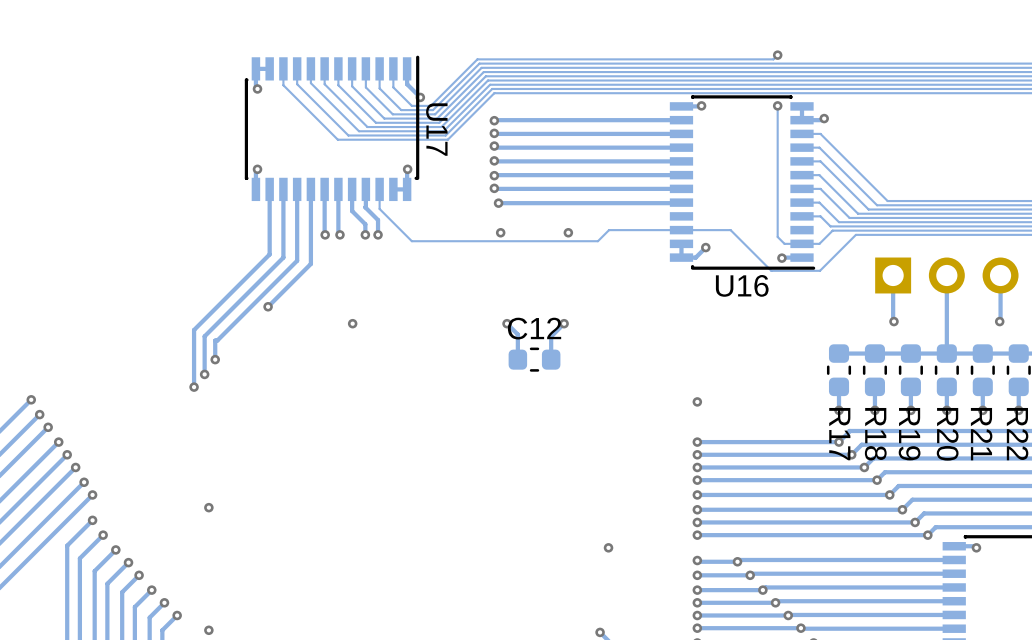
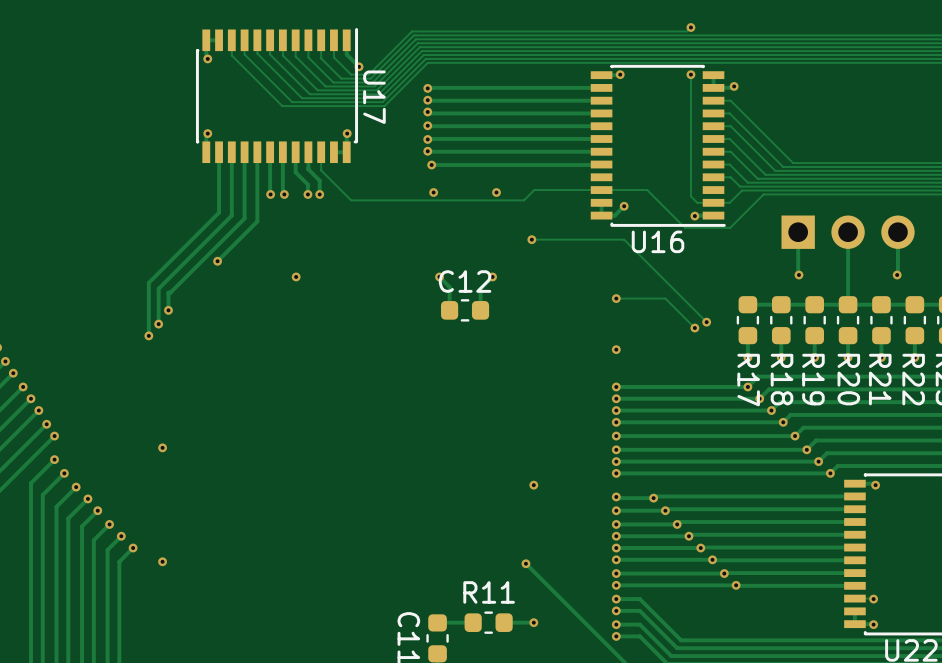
track: none -> (531, 239) (624, 239) (706, 322)
via: none -> (531, 239)
track: none -> (616, 298) (665, 298) (694, 328)
via: none -> (616, 298)
via: none -> (706, 322)
via: none -> (694, 328)

